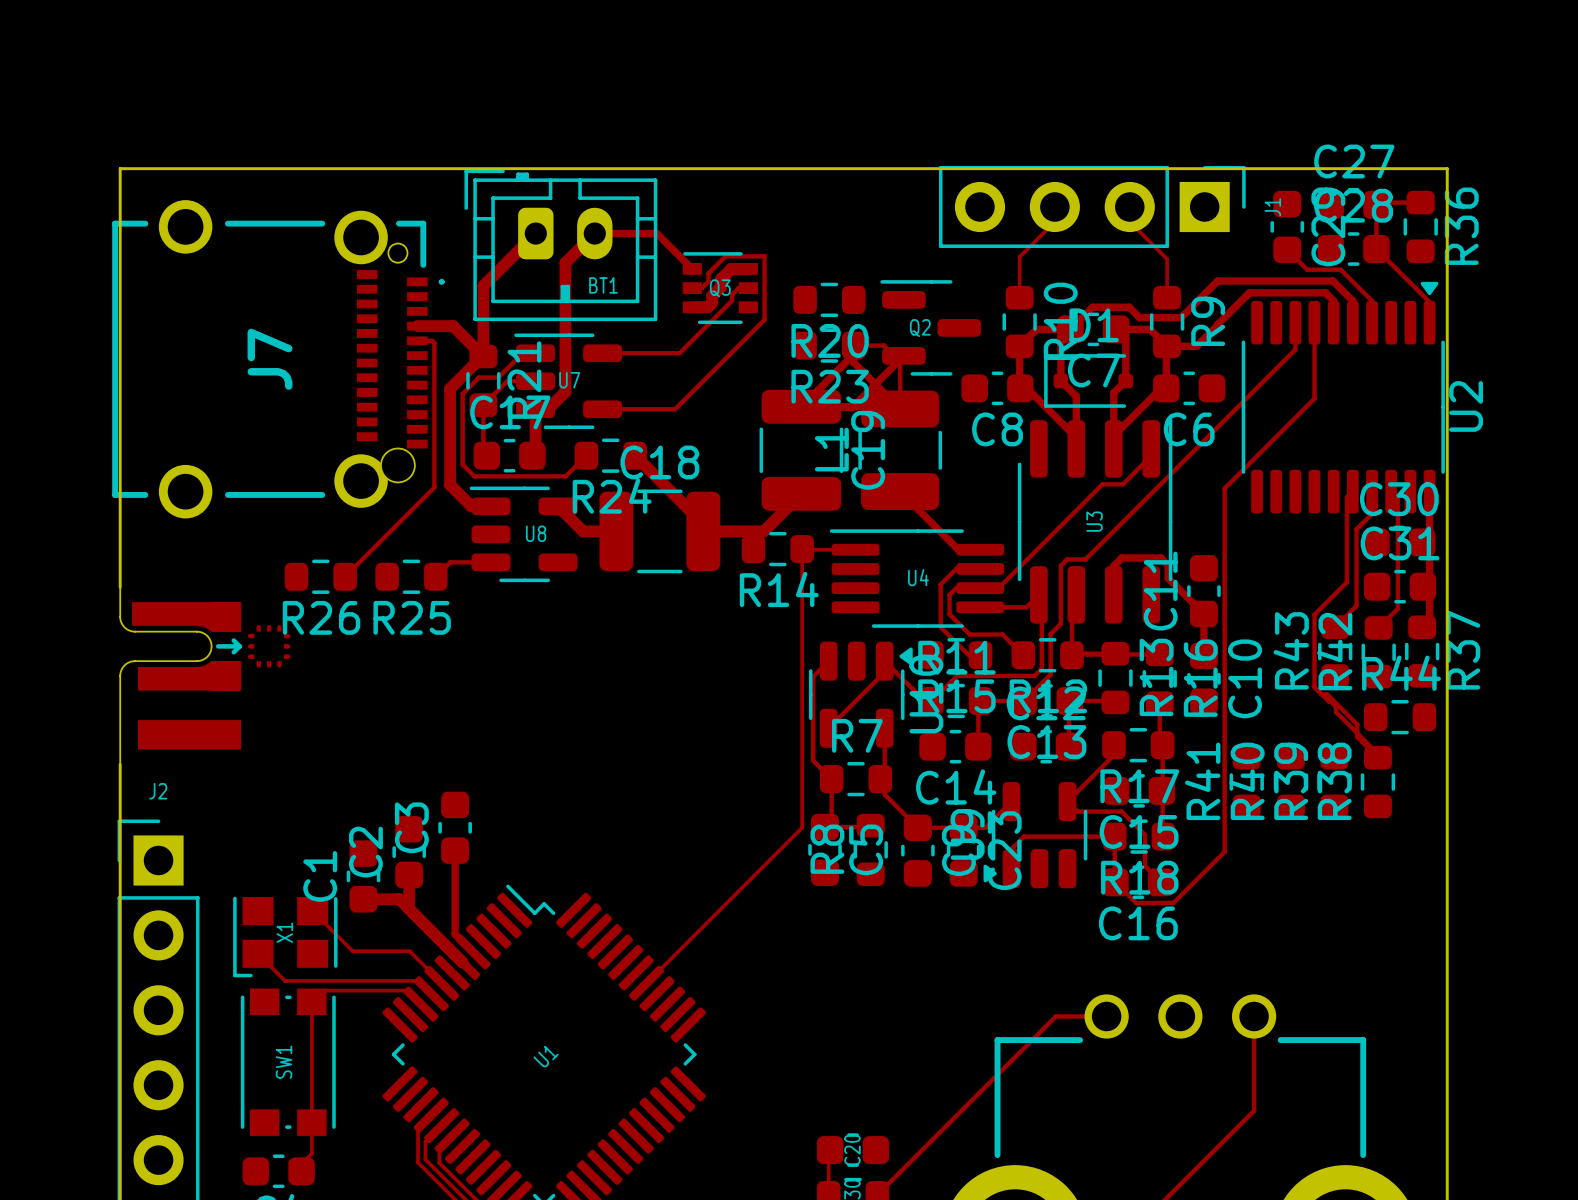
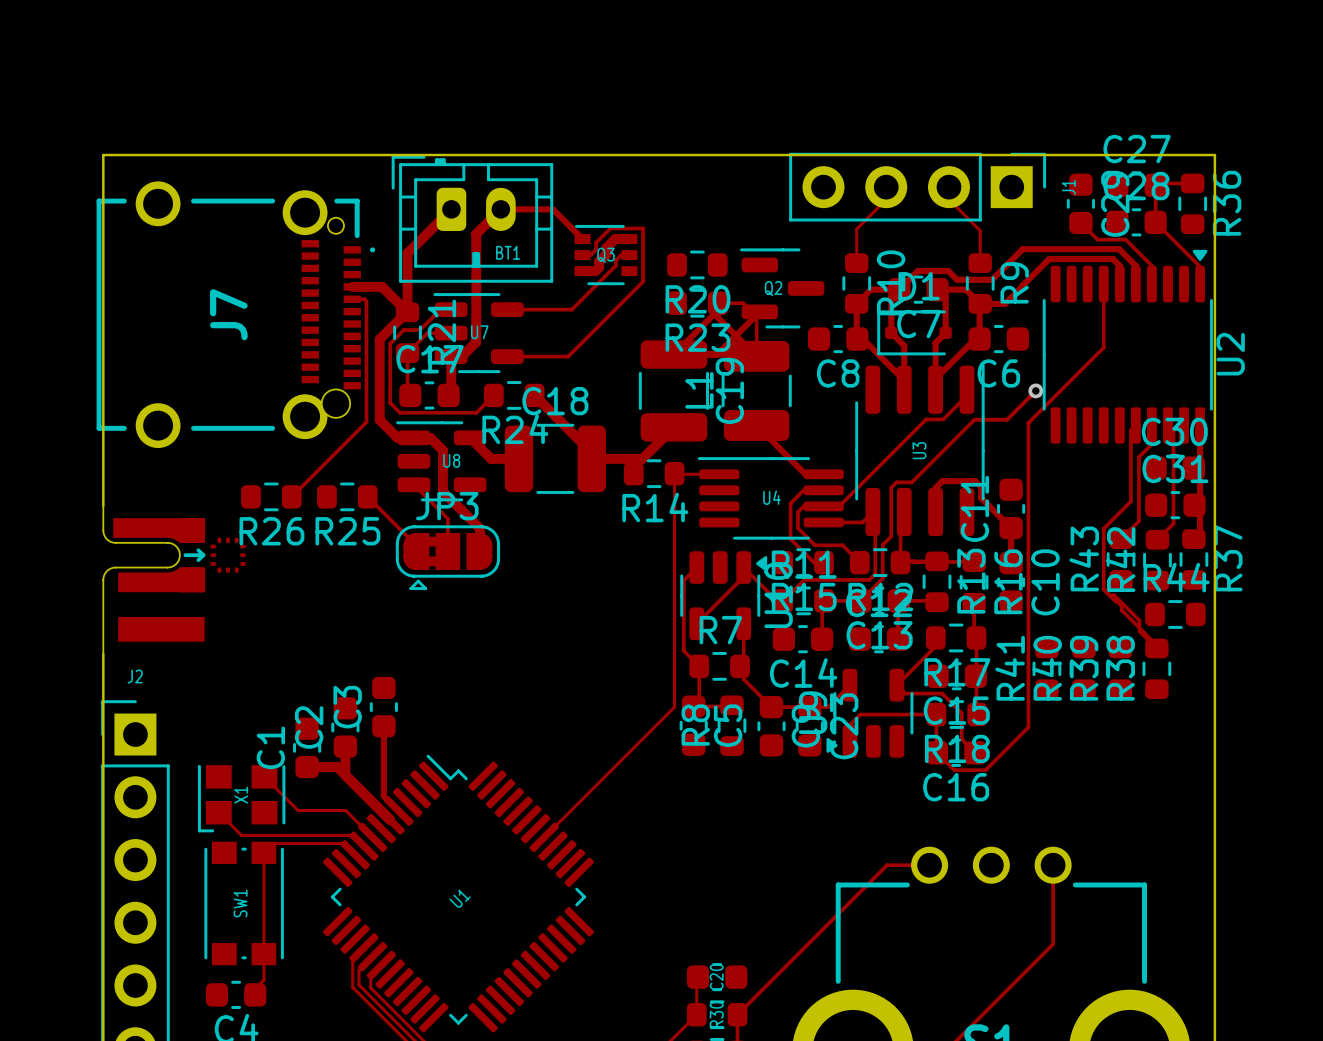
track: (1295, 322) (1295, 349) (1160, 484) -> (1035, 390) (1007, 419) (974, 419)
via: none -> (1035, 390)
track: none -> (413, 437) (430, 437) (442, 450) (442, 491) (480, 528) (480, 551)
track: (491, 562) (450, 562) (435, 576) -> (415, 551) (415, 544) (367, 496)
track: none -> (419, 490) (447, 518) (447, 551)
JP3: none -> (447, 557)

